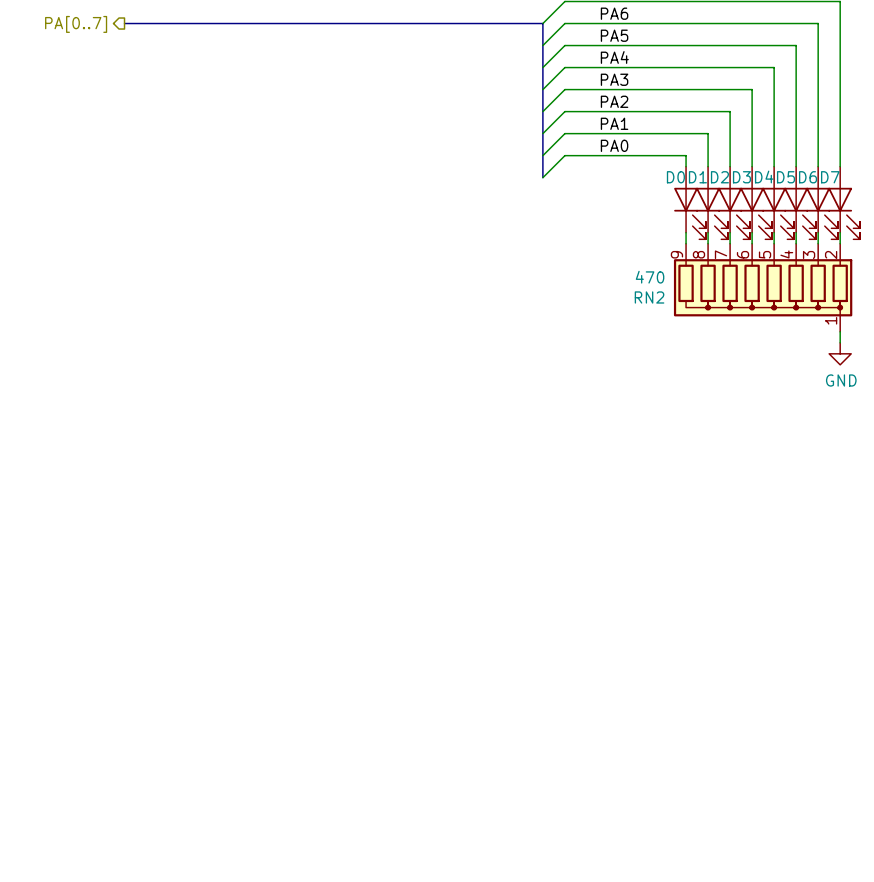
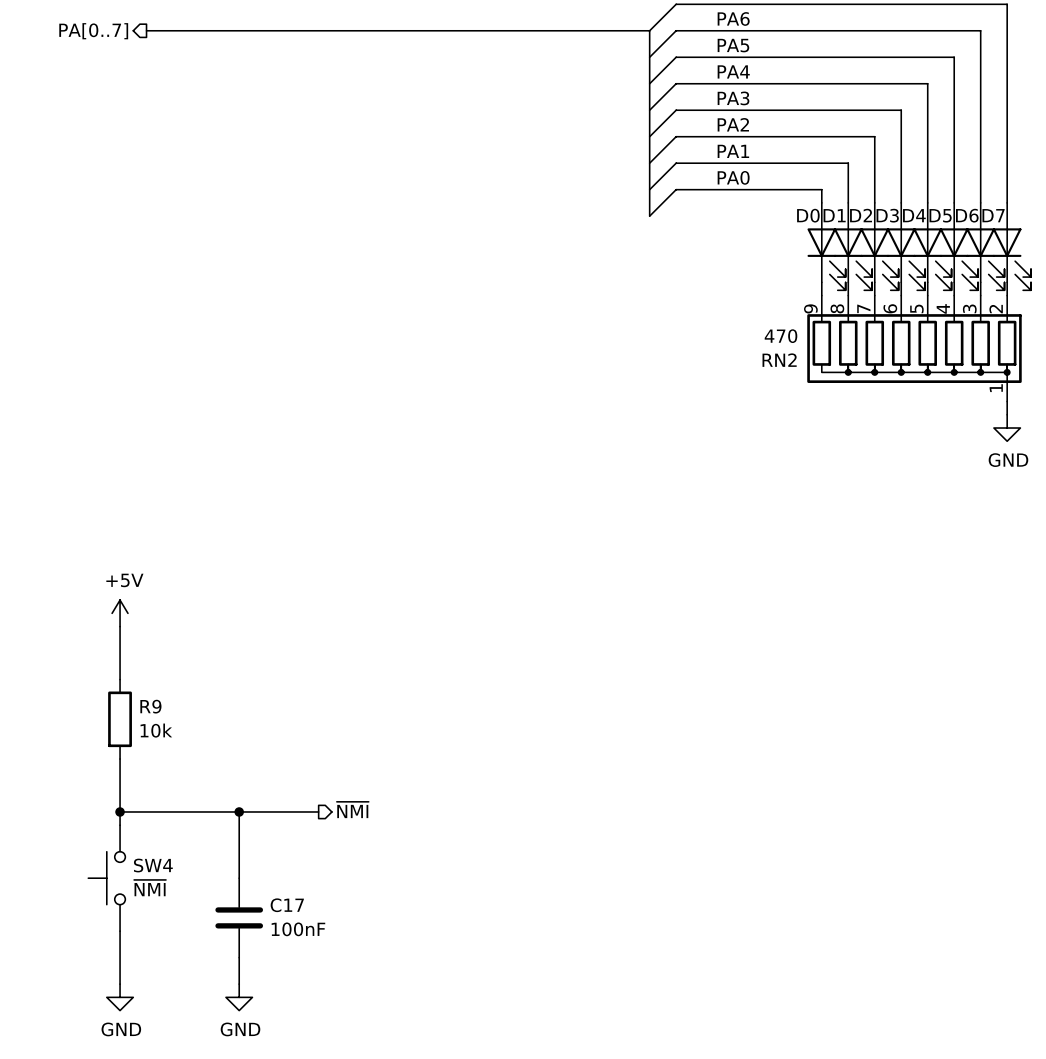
power symbol: none -> +5V (120, 613)
wire: none -> (120, 626) (120, 679)
R9: none -> 10k (120, 719)
wire: none -> (120, 759) (120, 825)
hierarchical label: none -> ~{NMI} (352, 809)
wire: none -> (120, 811) (318, 811)
junction: none -> (120, 811)
wire: none -> (239, 811) (239, 878)
junction: none -> (239, 811)
SW4: none -> ~{NMI} (106, 878)
C17: none -> 100nF (239, 917)
wire: none -> (120, 931) (120, 984)
wire: none -> (239, 957) (239, 984)
power symbol: none -> GND (120, 997)
power symbol: none -> GND (239, 997)

